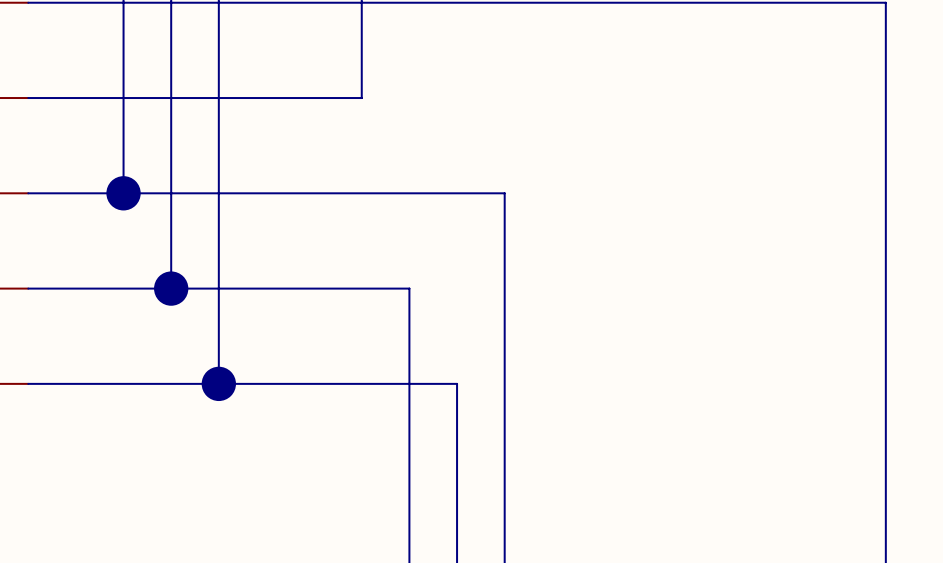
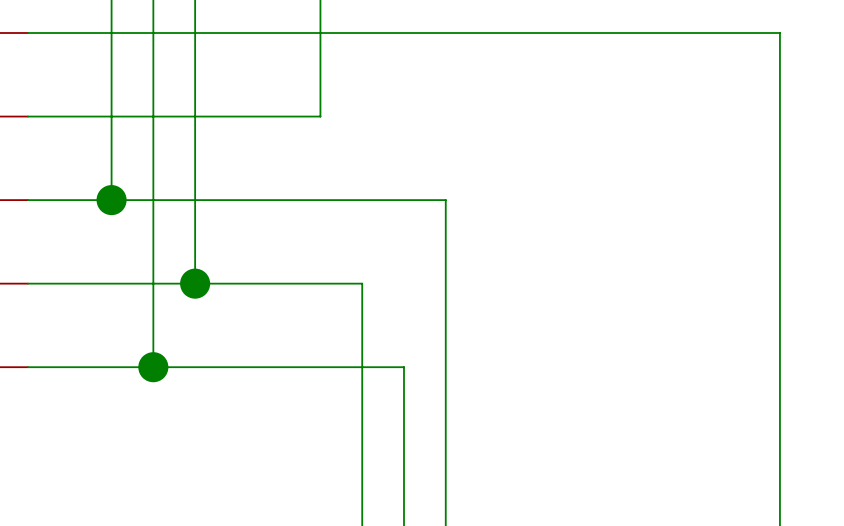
junction: (171, 288) -> none
wire: (218, 288) (218, 383) -> (153, 283) (153, 367)
junction: none -> (195, 283)
junction: none -> (153, 367)
junction: (218, 383) -> none

